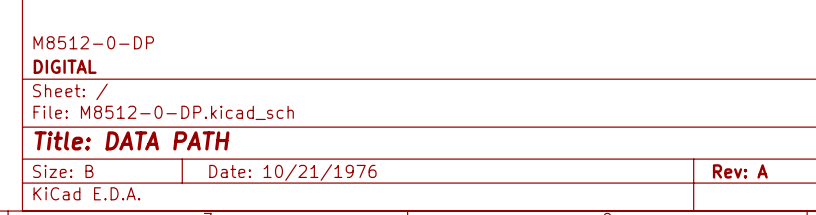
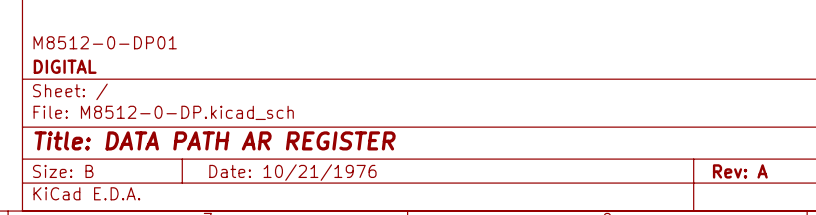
title block: M8512-0-DP (93, 42) -> M8512-0-DP01 (105, 42)
title block: Title: DATA PATH (131, 140) -> Title: DATA PATH AR REGISTER (215, 140)

